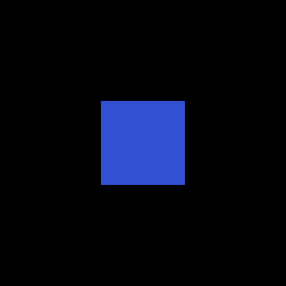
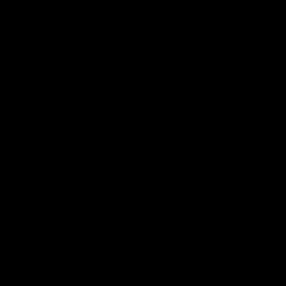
part: (142, 142) -> none

